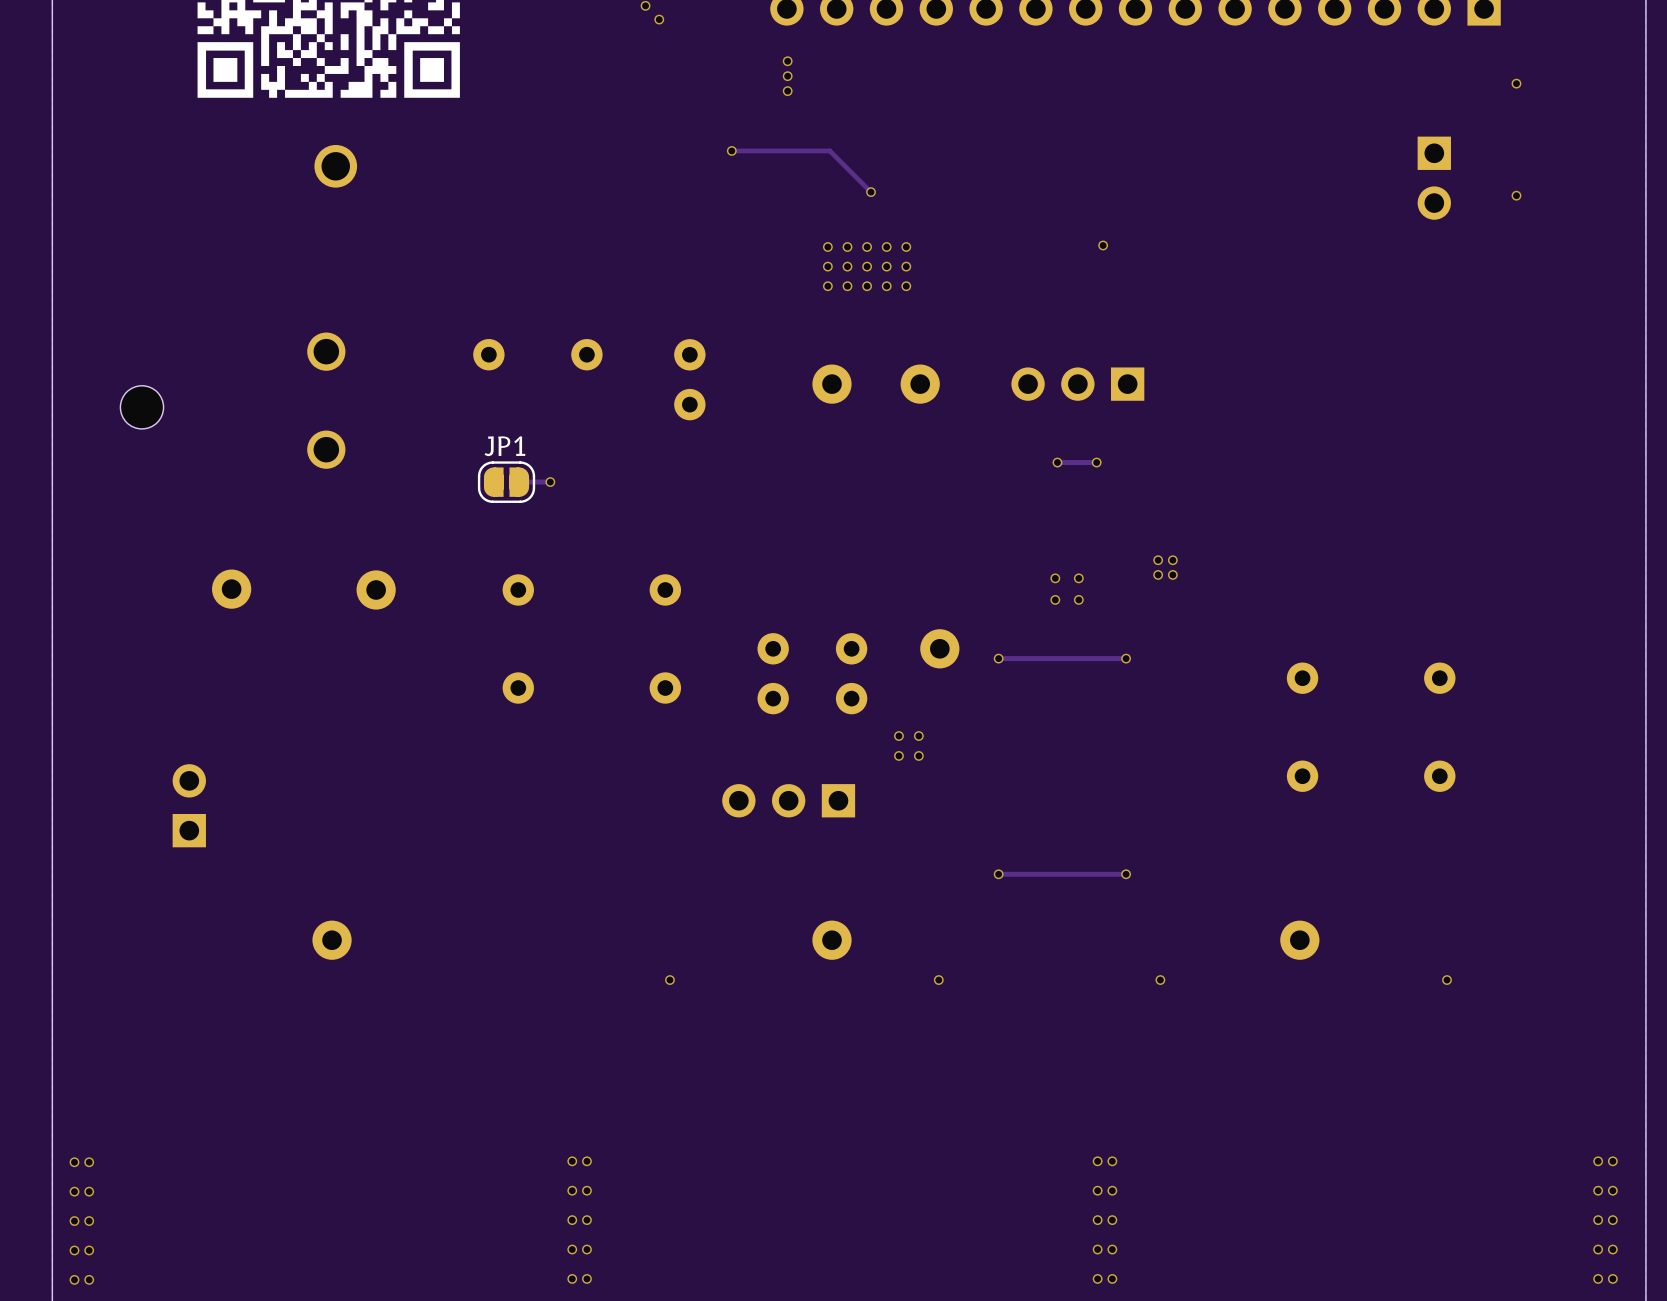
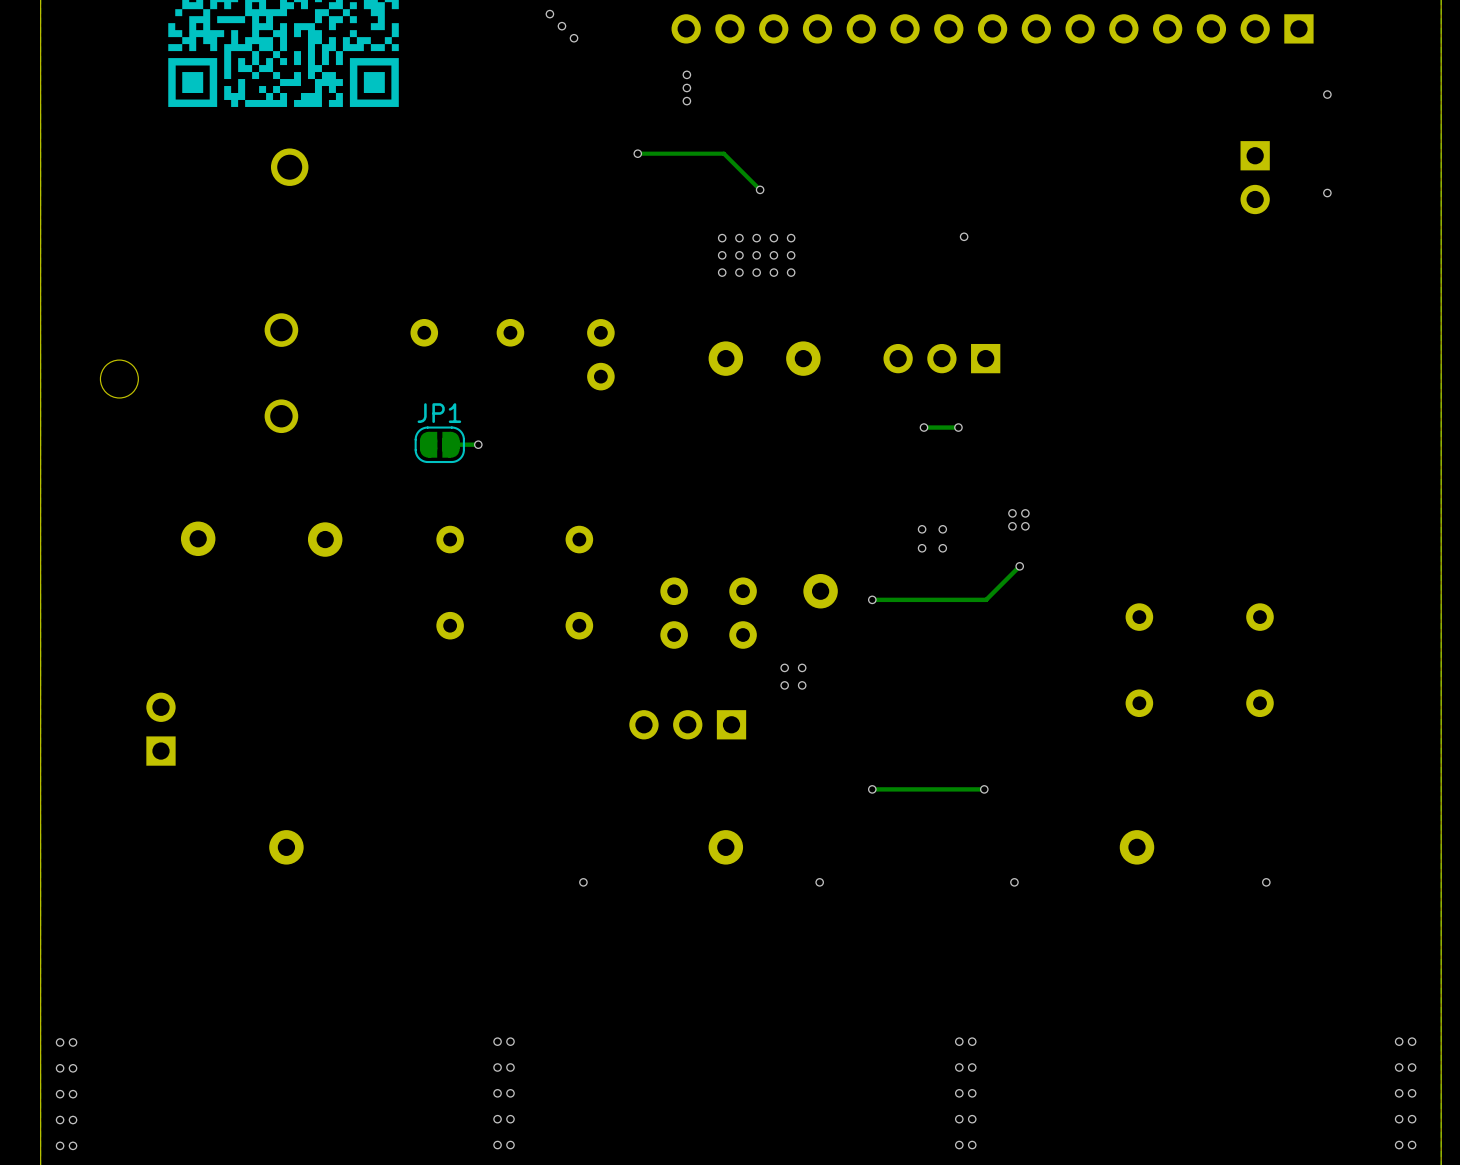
track: none -> (1019, 566) (984, 599)
via position: (1126, 658) -> (1019, 566)

